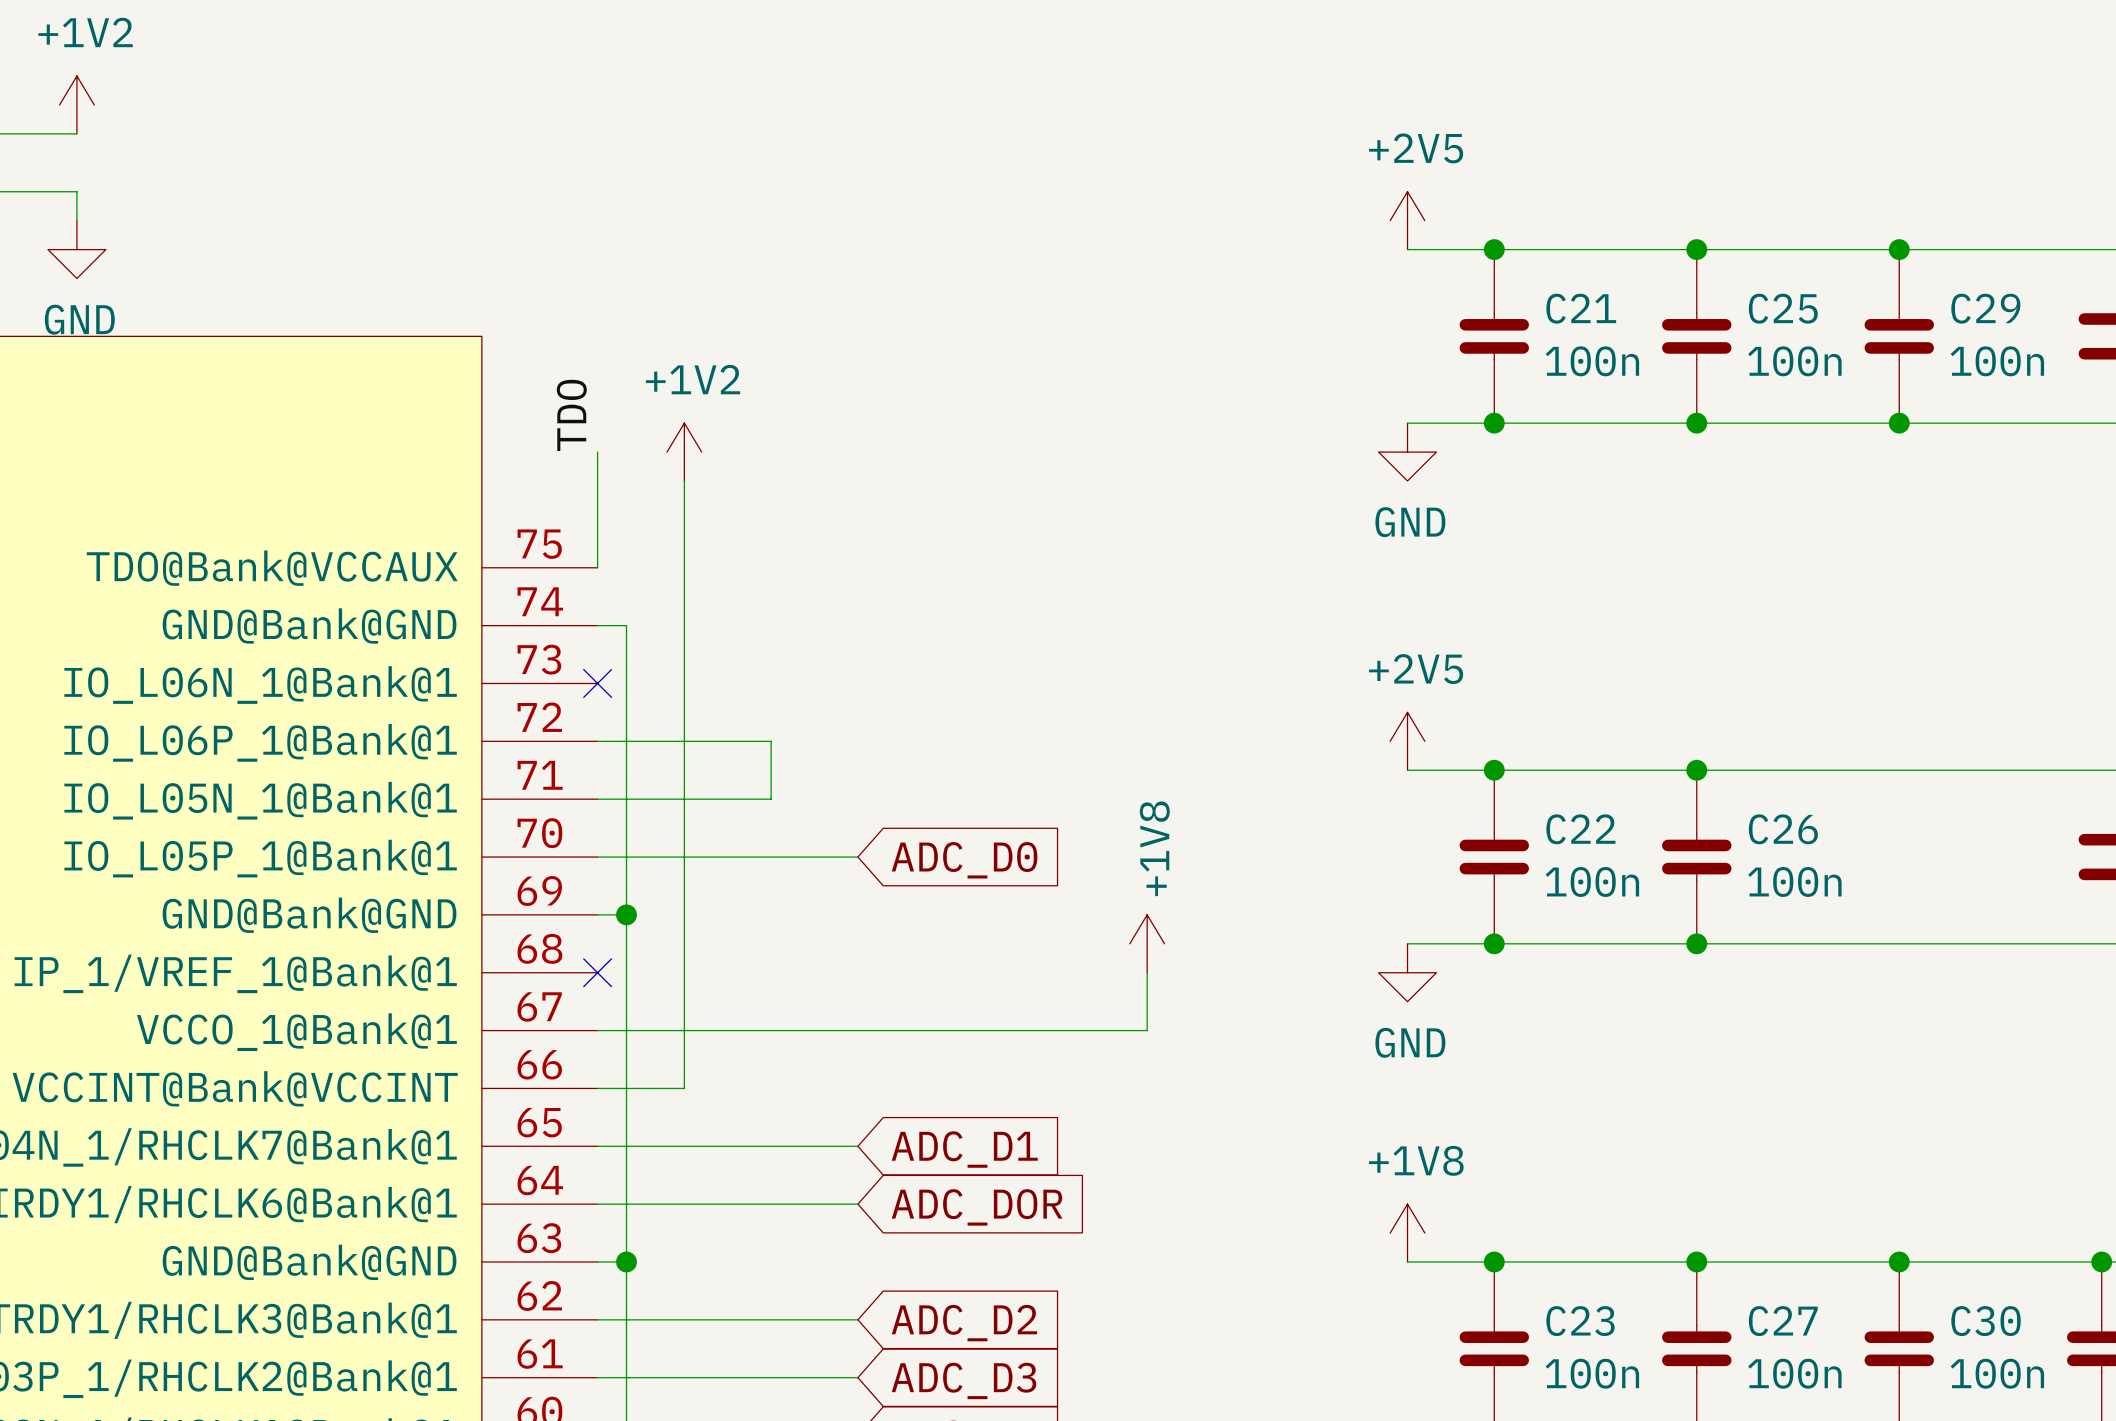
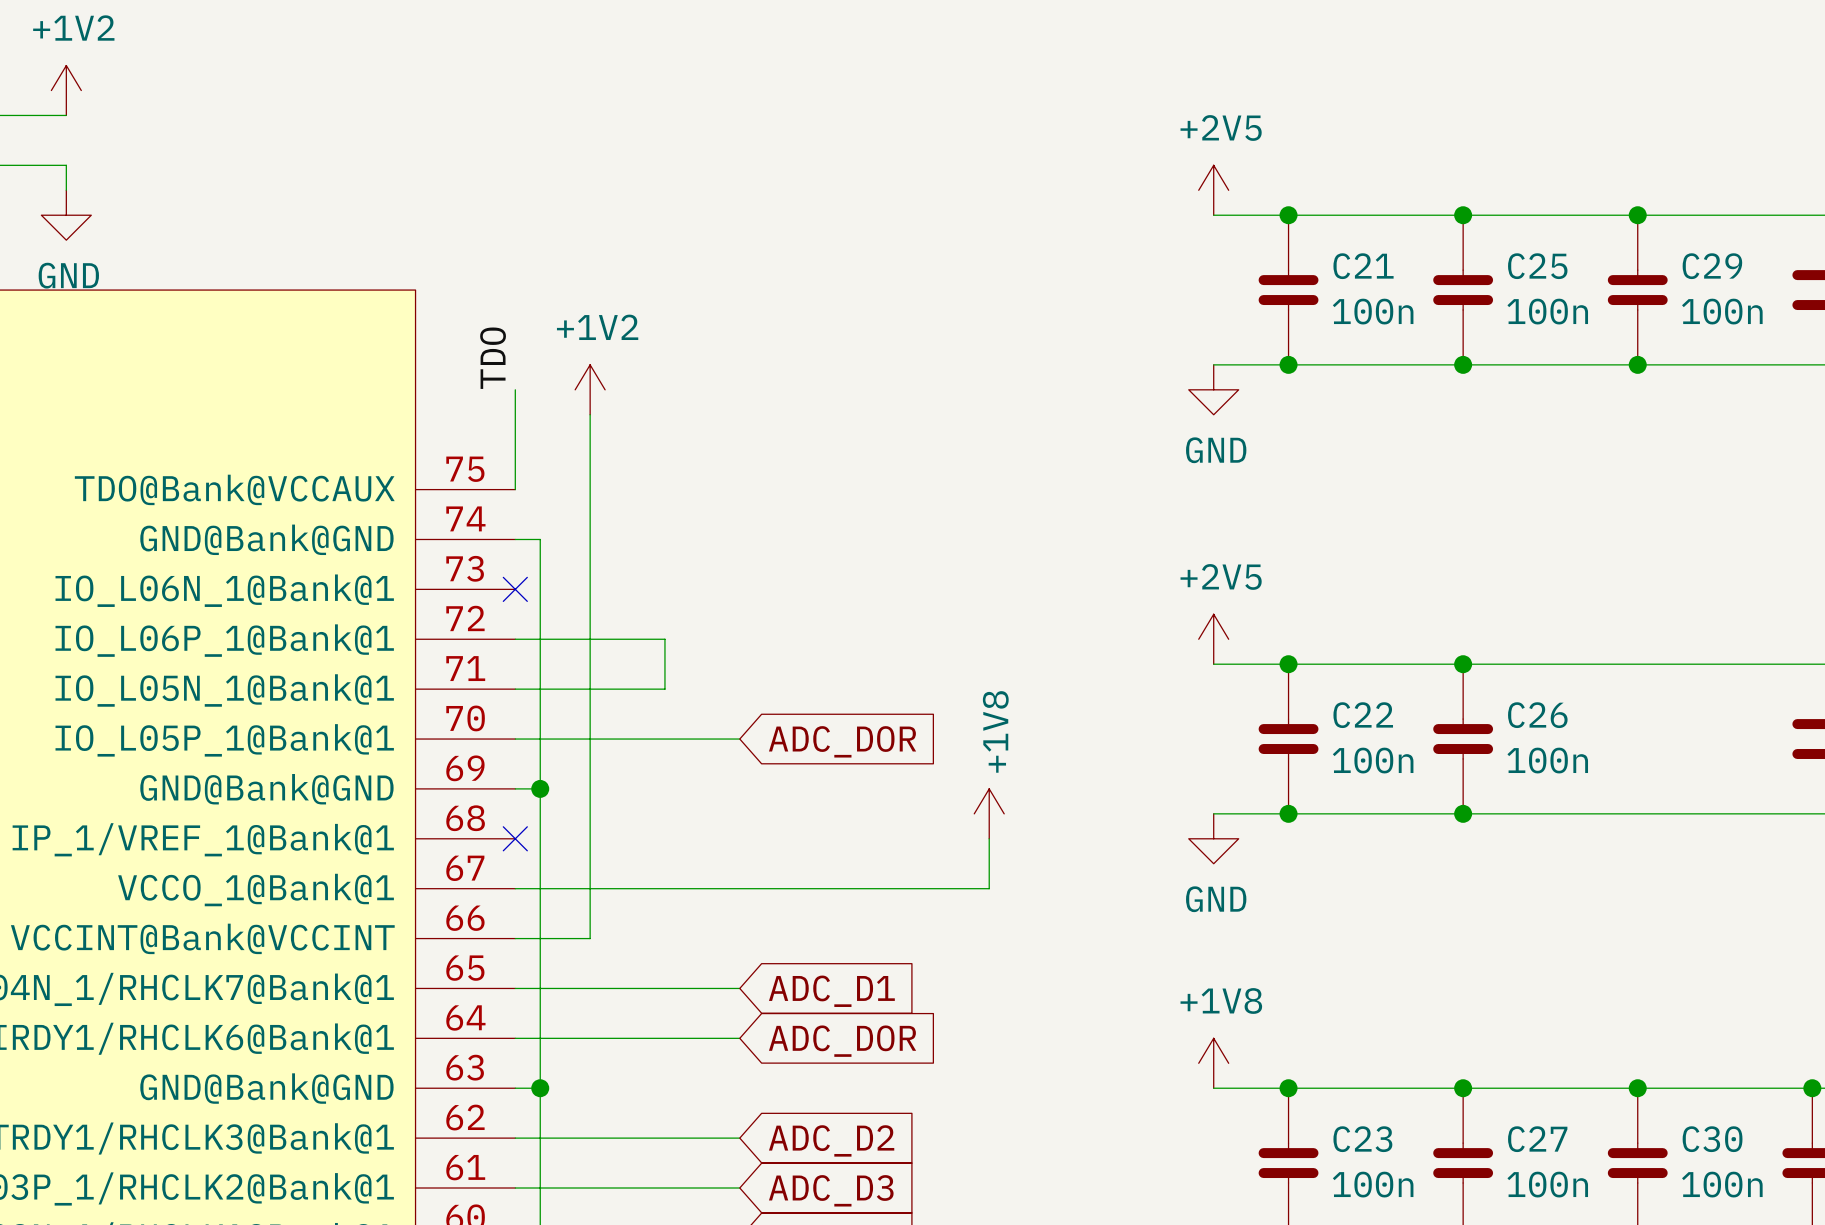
global label: ADC_D0 (964, 860) -> ADC_DOR (842, 741)

